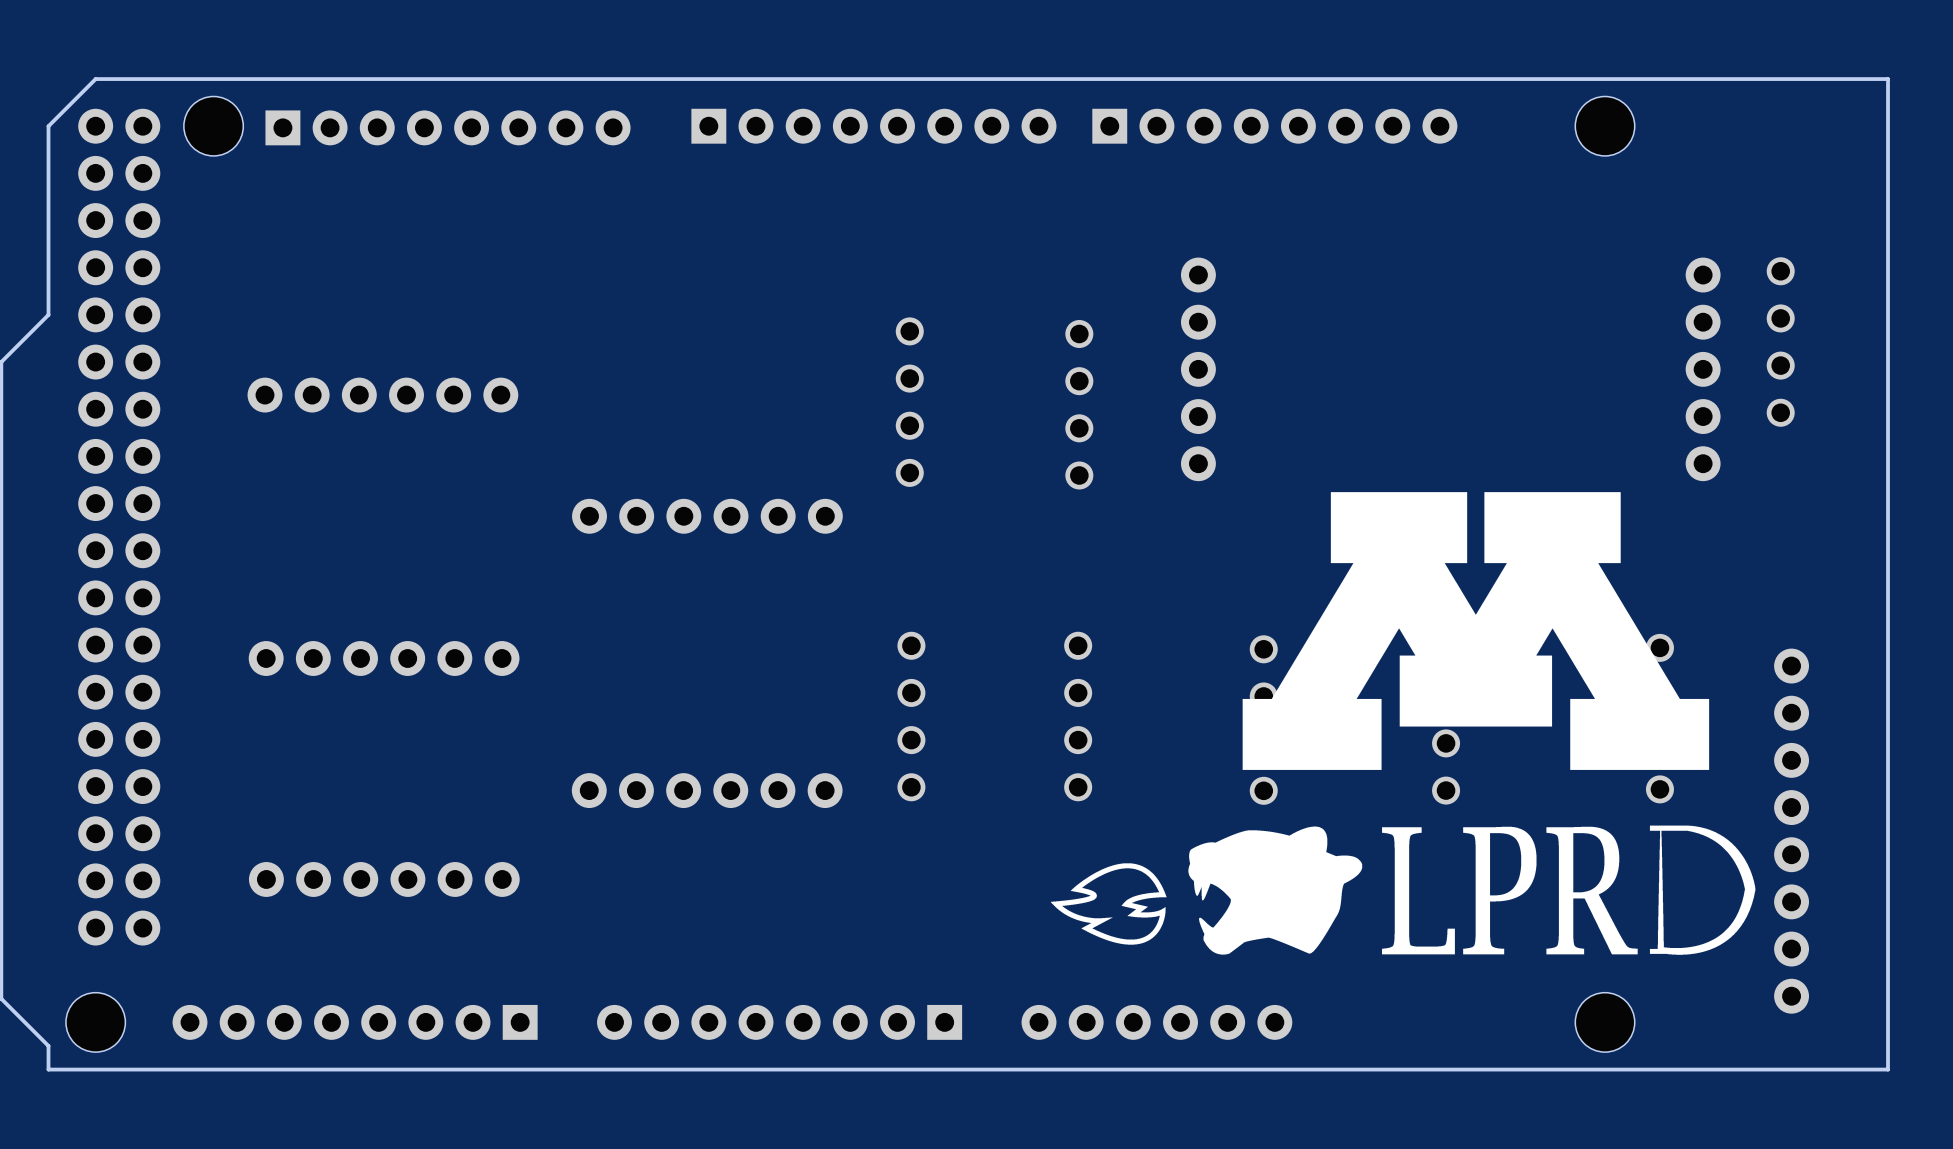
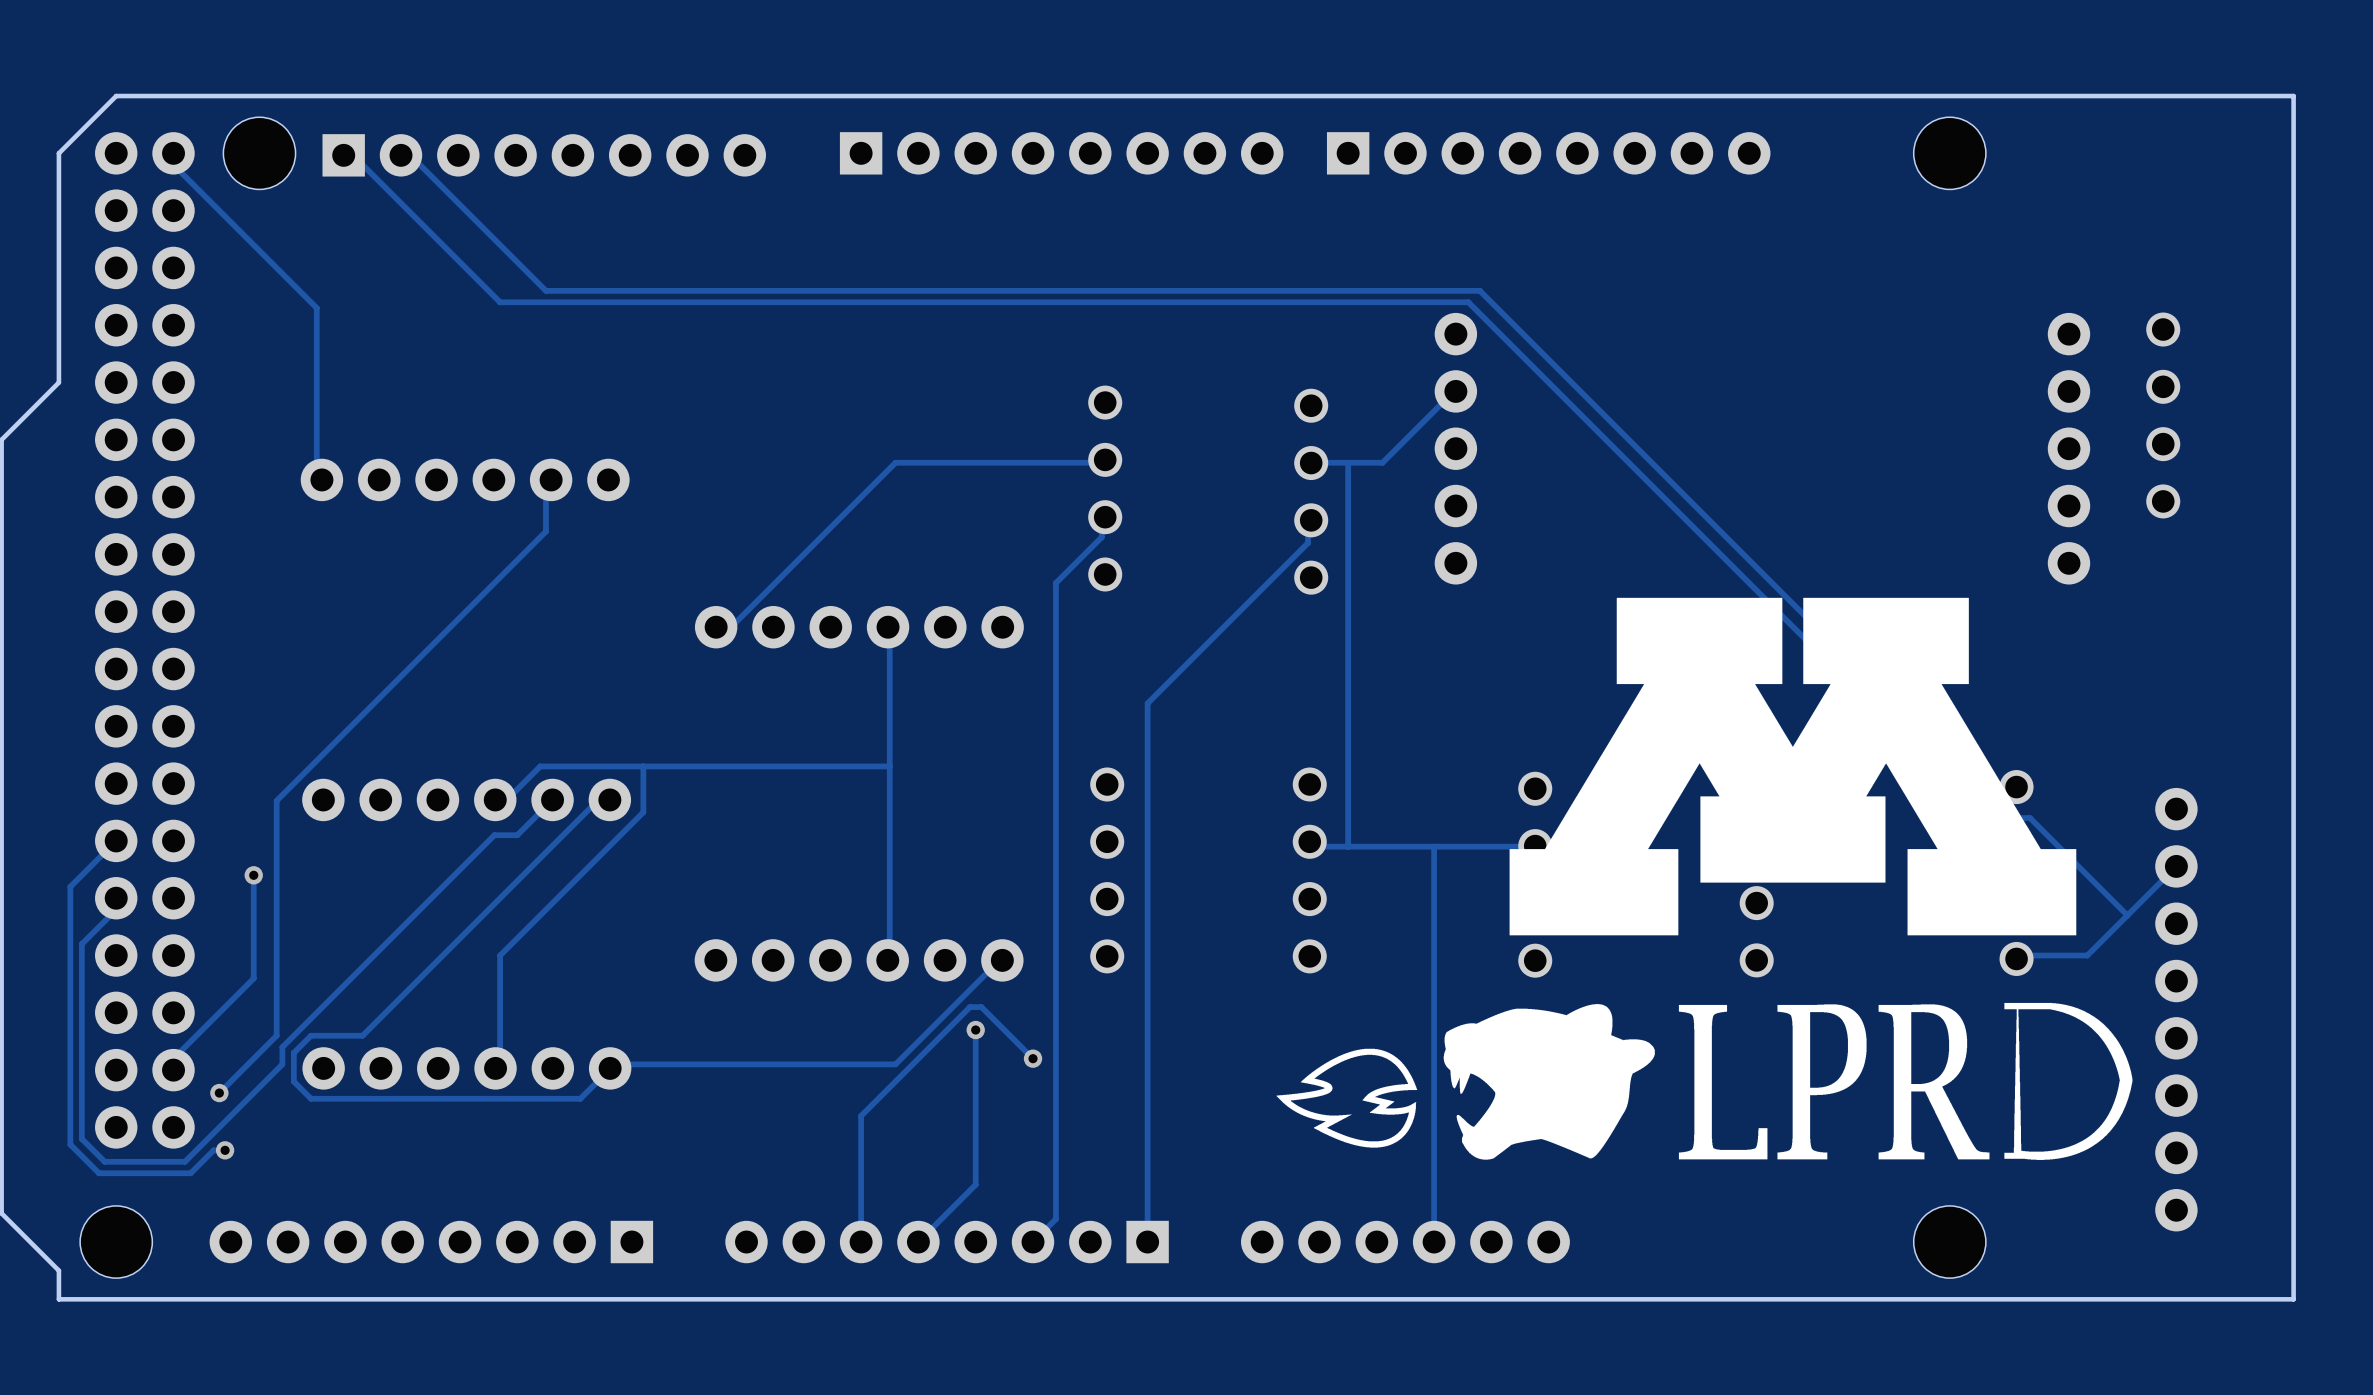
track: none -> (173, 153) (173, 164) (316, 308) (316, 479) (321, 479)
track: none -> (343, 155) (345, 159) (356, 159) (500, 302) (1468, 302) (1989, 823) (1989, 875) (2016, 901)
track: none -> (401, 155) (402, 159) (414, 159) (545, 290) (1479, 290) (2007, 818) (2030, 818) (2127, 915)
track: none -> (1455, 391) (1382, 462) (1311, 463)
track: none -> (1105, 459) (1101, 462) (895, 462) (735, 623) (717, 623) (716, 627)
track: none -> (1348, 462) (1348, 846)
track: none -> (551, 479) (545, 479) (545, 531) (276, 800) (276, 1035) (219, 1093)
track: none -> (1105, 517) (1101, 520) (1101, 537) (1055, 583) (1055, 1219) (1033, 1242)
track: none -> (1311, 520) (1308, 525) (1308, 542) (1147, 703) (1147, 1242)
track: none -> (888, 627) (889, 628) (889, 955) (887, 960)
track: none -> (643, 766) (643, 812) (500, 955) (500, 1064) (495, 1068)
track: none -> (889, 766) (540, 766) (511, 795) (500, 795) (495, 799)
track: none -> (552, 799) (517, 835) (494, 835) (282, 1047) (282, 1064) (184, 1161) (104, 1161) (81, 1138) (81, 944) (116, 909) (116, 898)
track: none -> (609, 799) (597, 800) (362, 1035) (311, 1035) (293, 1052) (293, 1081) (311, 1098) (580, 1098) (614, 1064) (895, 1064) (998, 961) (1002, 960)
track: none -> (116, 840) (70, 886) (70, 1144) (99, 1173) (190, 1173) (213, 1150) (225, 1150)
track: none -> (1309, 841) (1313, 846) (1535, 846)
track: none -> (1434, 846) (1434, 1242)
track: none -> (2176, 866) (2087, 955) (2018, 955) (2016, 958)
track: none -> (253, 875) (253, 978) (173, 1058) (173, 1070)
via: none -> (253, 875)
track: none -> (975, 1030) (975, 1184) (918, 1242)
via: none -> (975, 1030)
track: none -> (1033, 1058) (981, 1007) (969, 1007) (861, 1115) (861, 1242)
via: none -> (1033, 1058)
via: none -> (219, 1093)
via: none -> (225, 1150)

